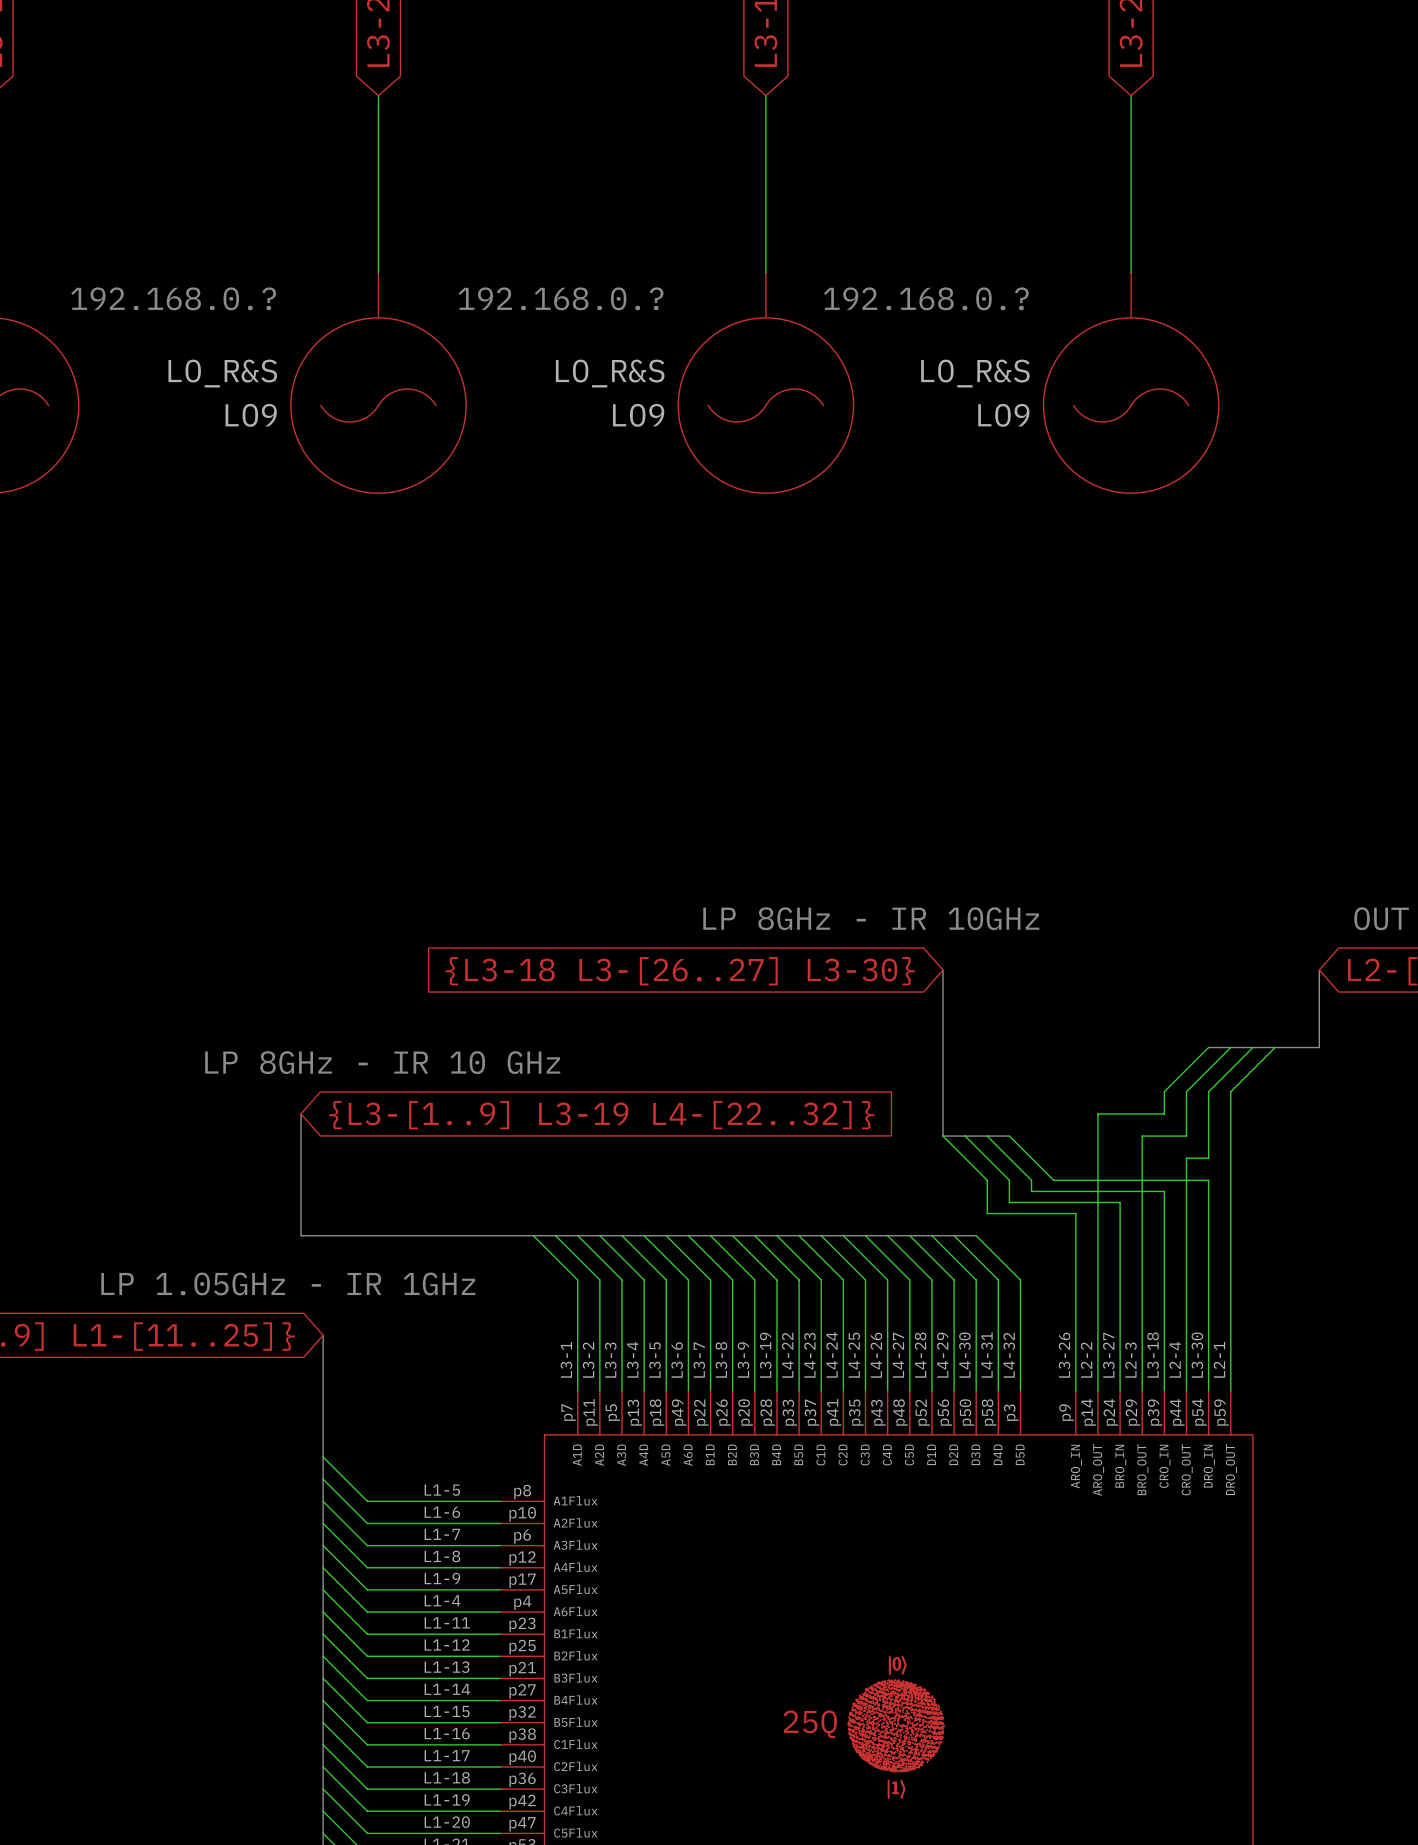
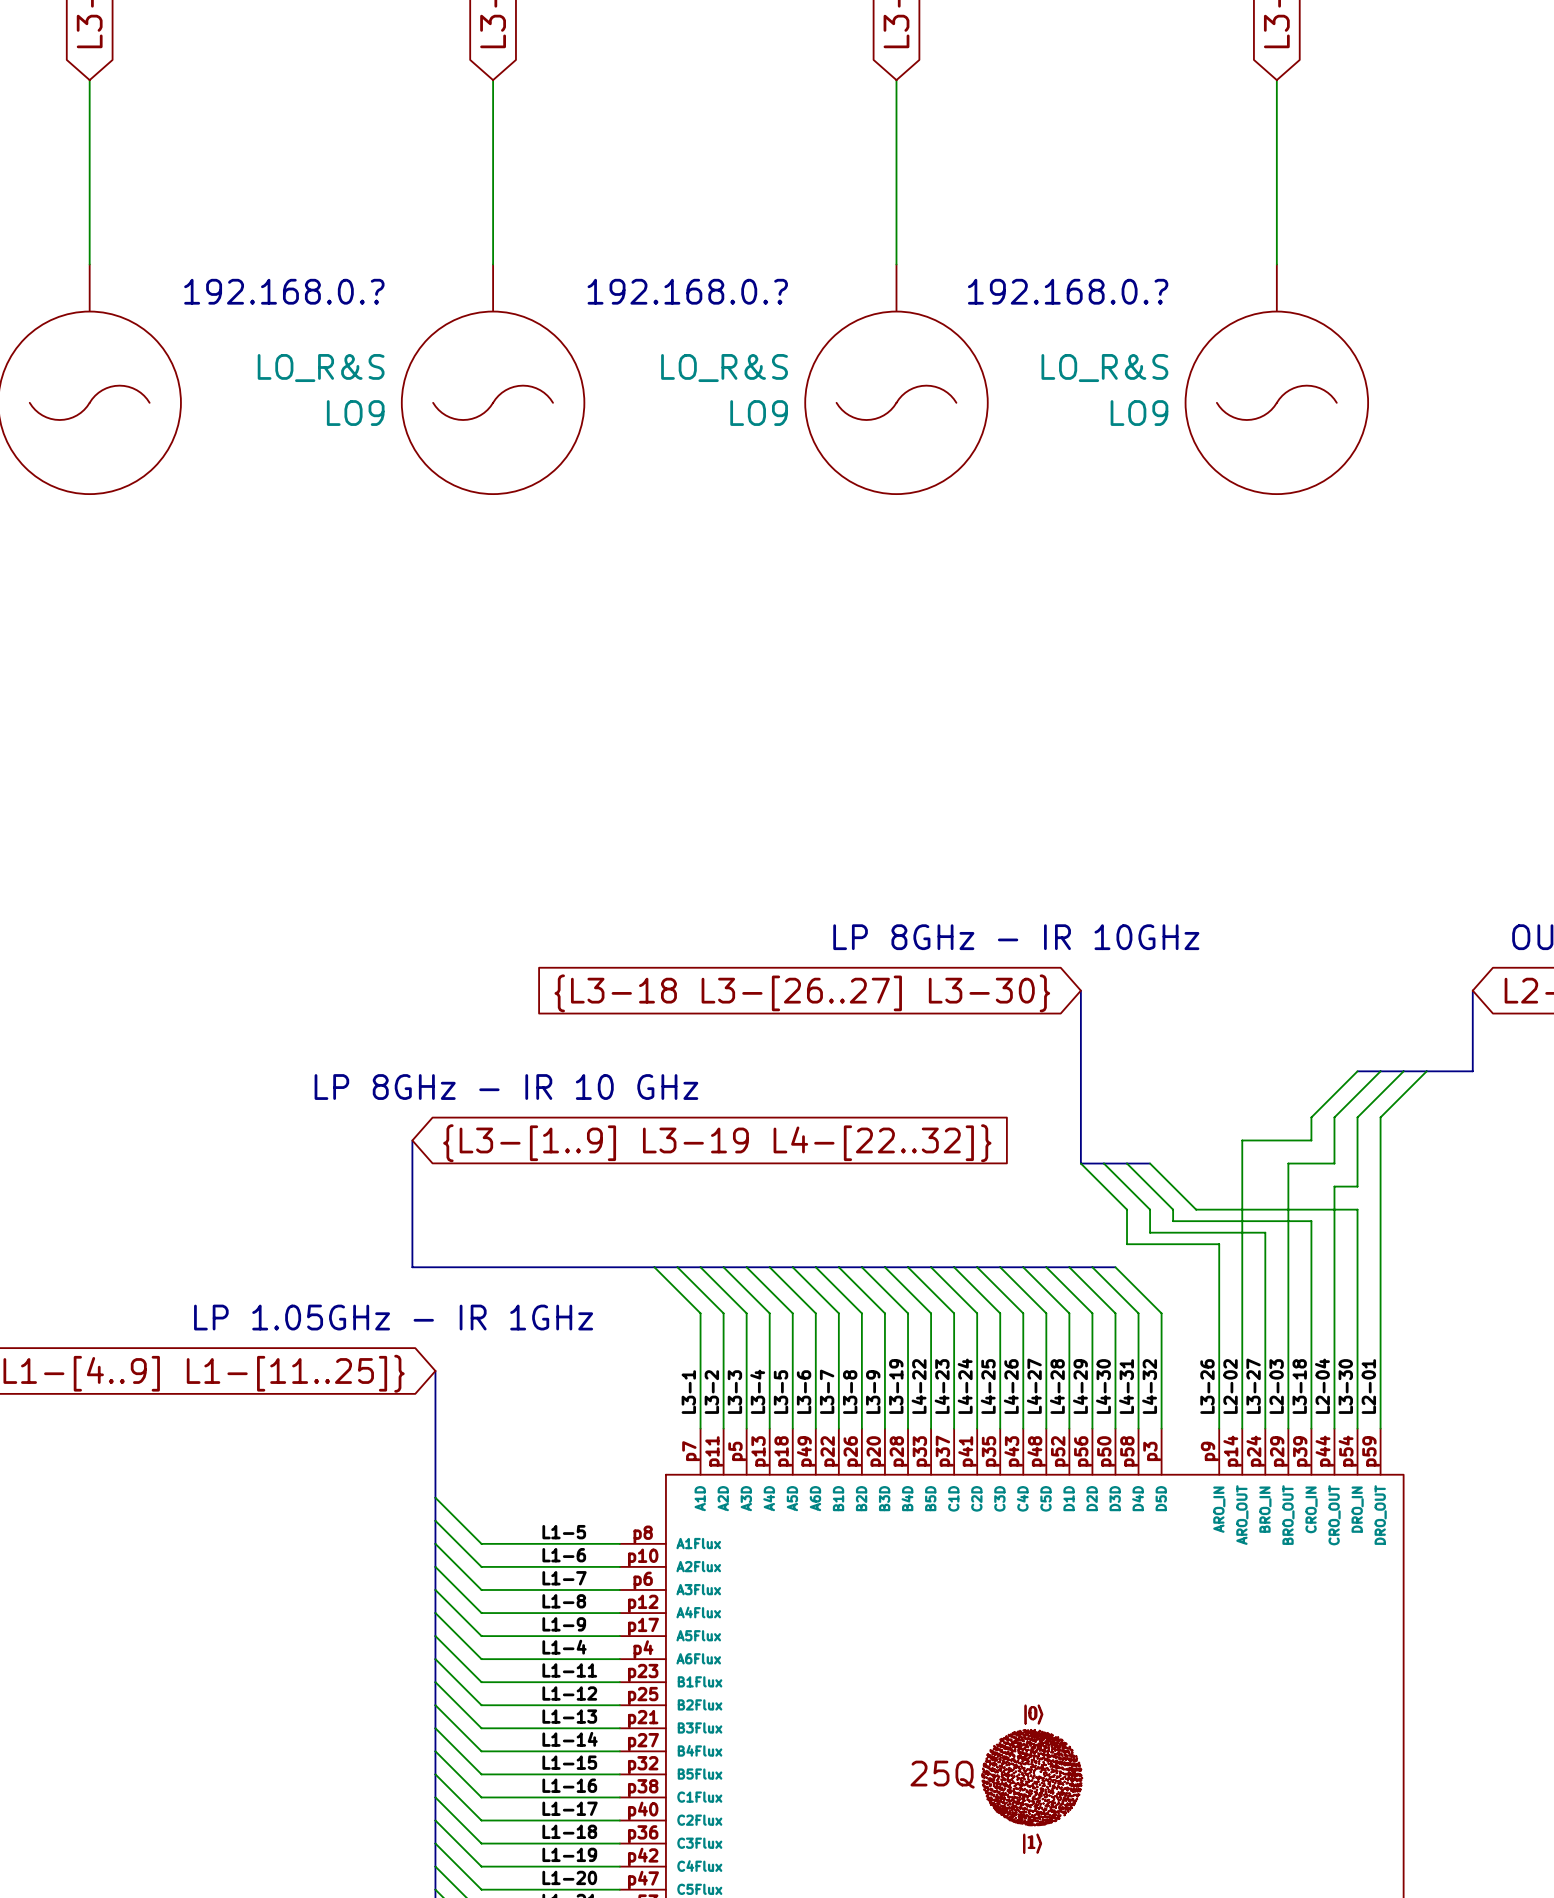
label: L2-2 (1086, 1359) -> L2-02 (1230, 1386)
label: L2-4 (1175, 1359) -> L2-04 (1322, 1386)
label: L2-1 (1219, 1359) -> L2-01 (1368, 1386)
label: L2-3 (1130, 1360) -> L2-03 (1276, 1386)

